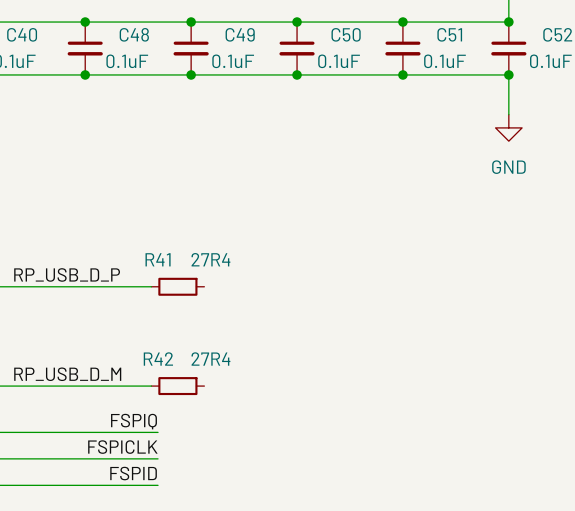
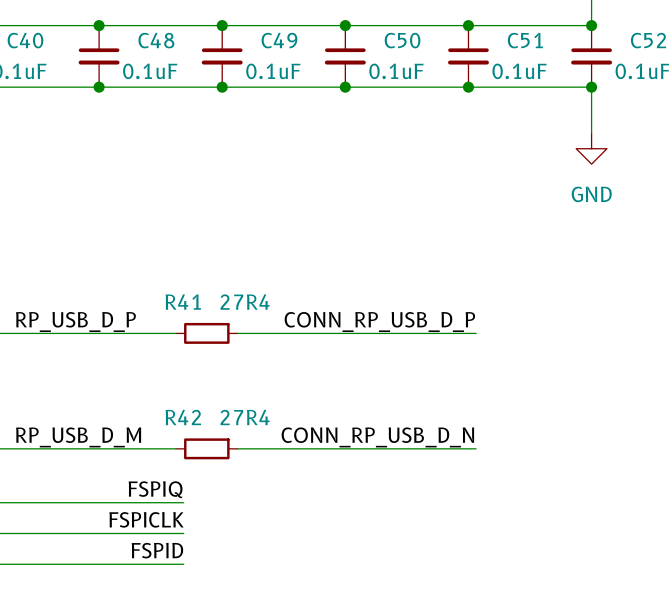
label: none -> CONN_RP_USB_D_P (379, 321)
wire: none -> (237, 333) (476, 333)
label: none -> CONN_RP_USB_D_N (377, 437)
wire: none -> (237, 448) (476, 448)

